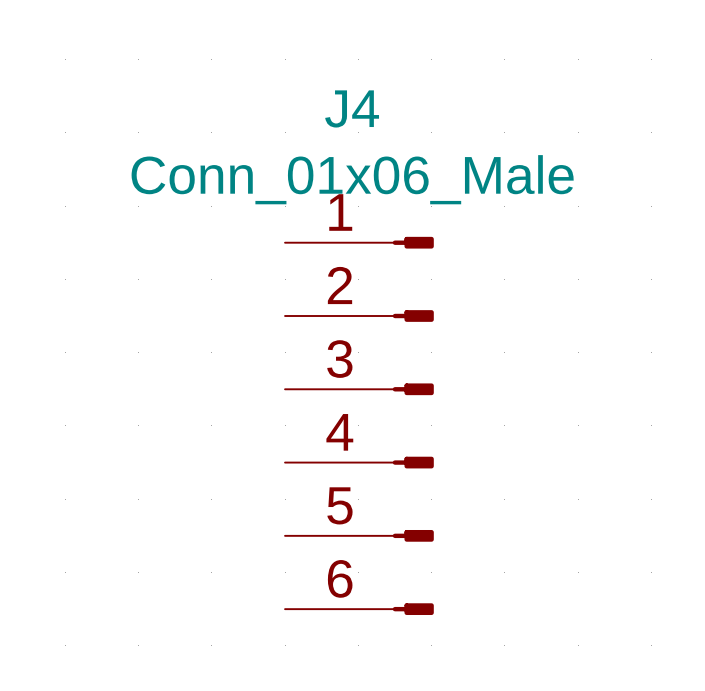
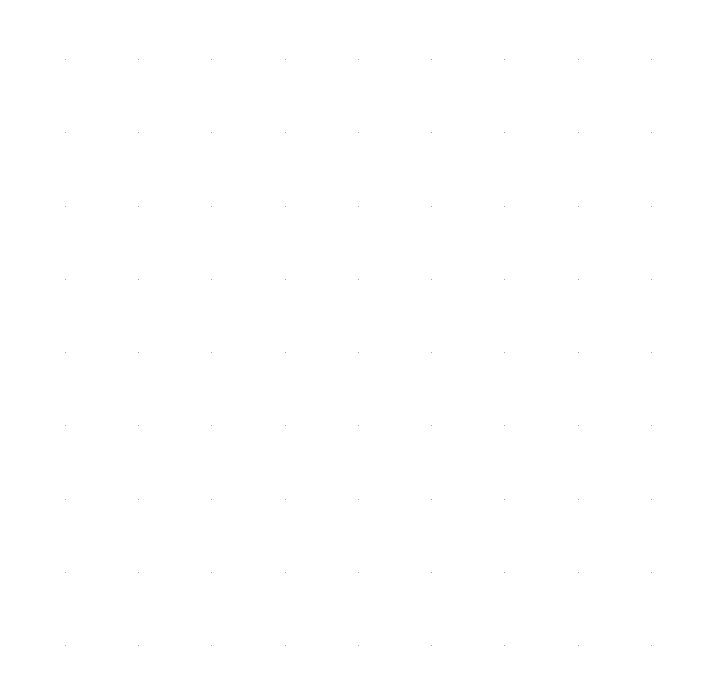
J4: Conn_01x06_Male (359, 425) -> none

